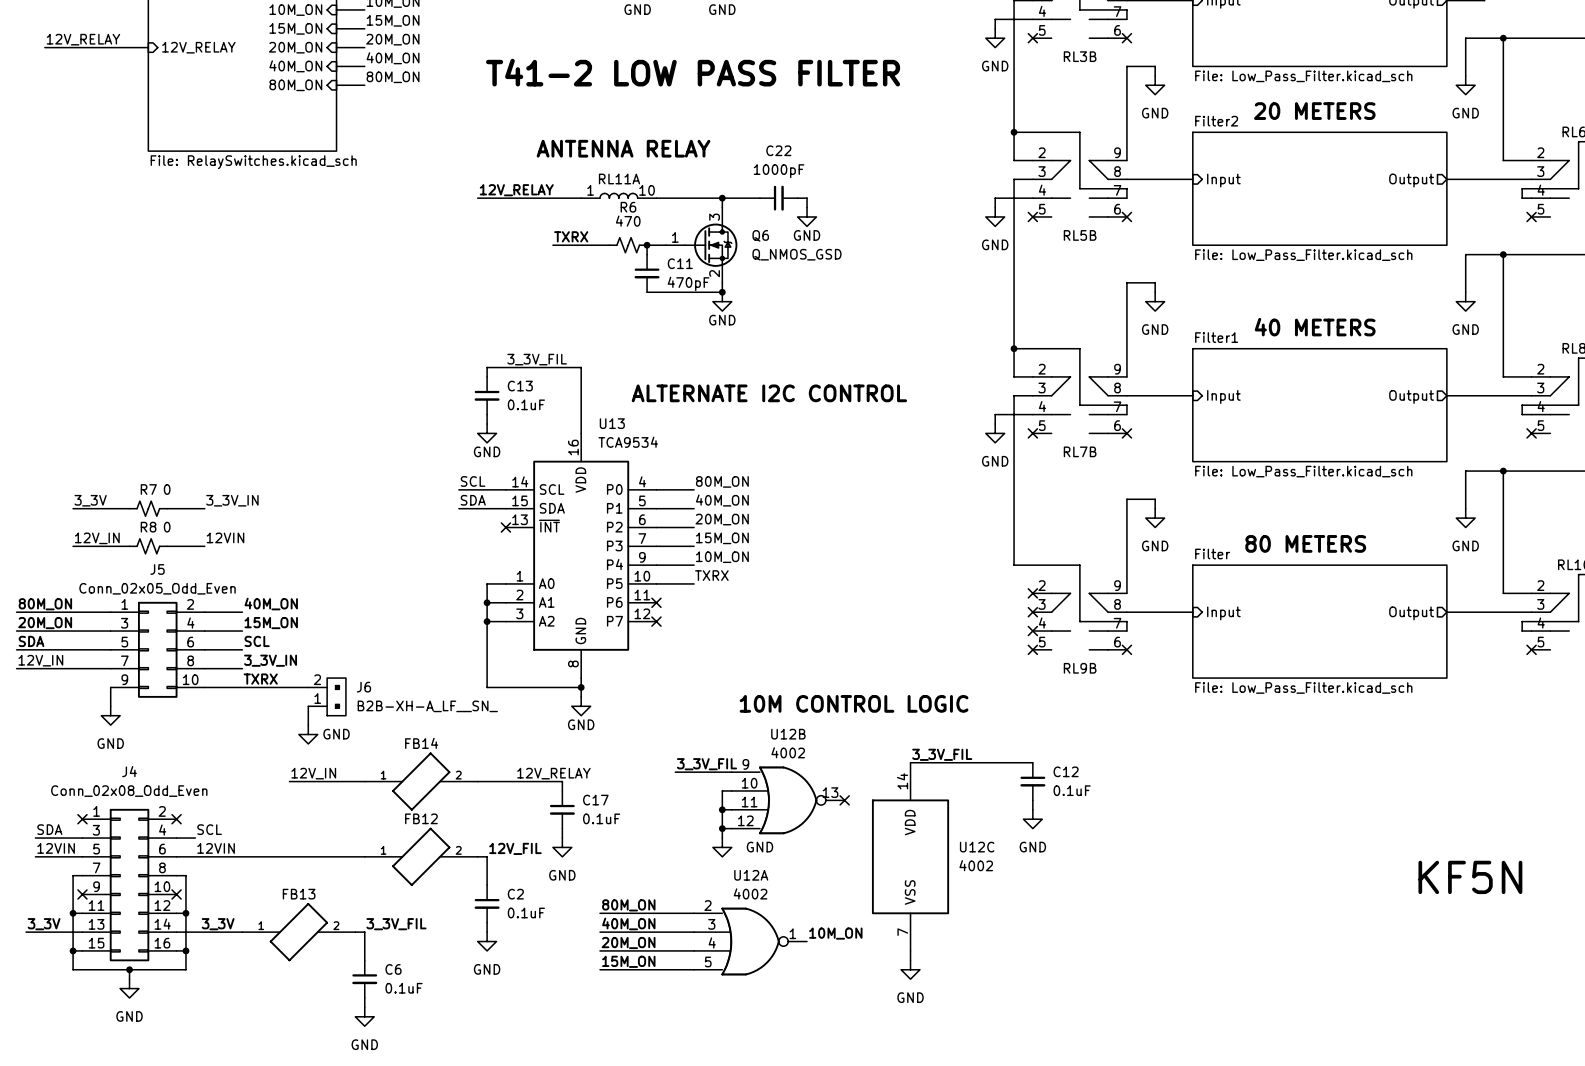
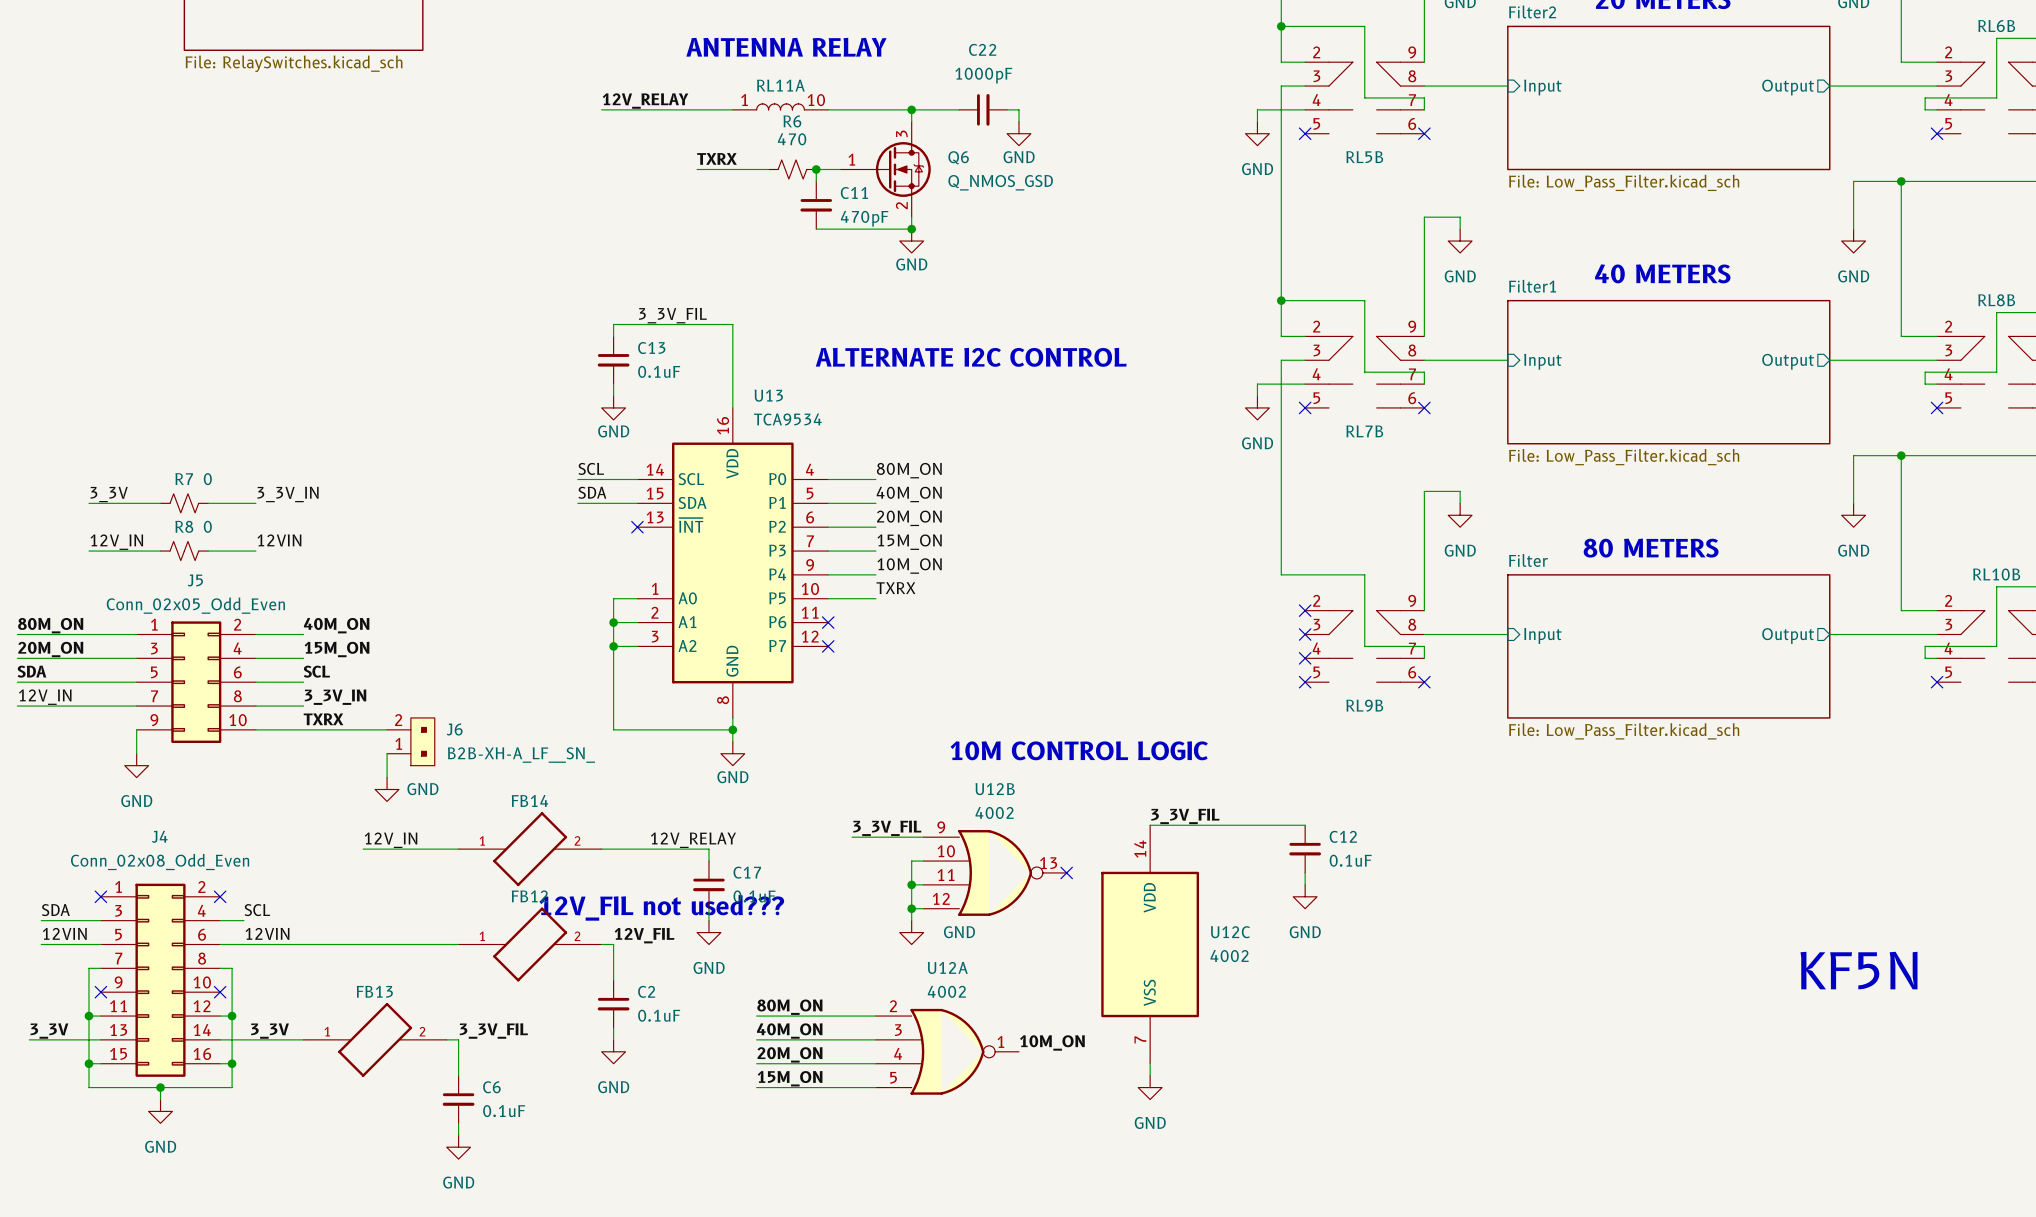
text: none -> 12V_FIL not used??? (661, 907)

